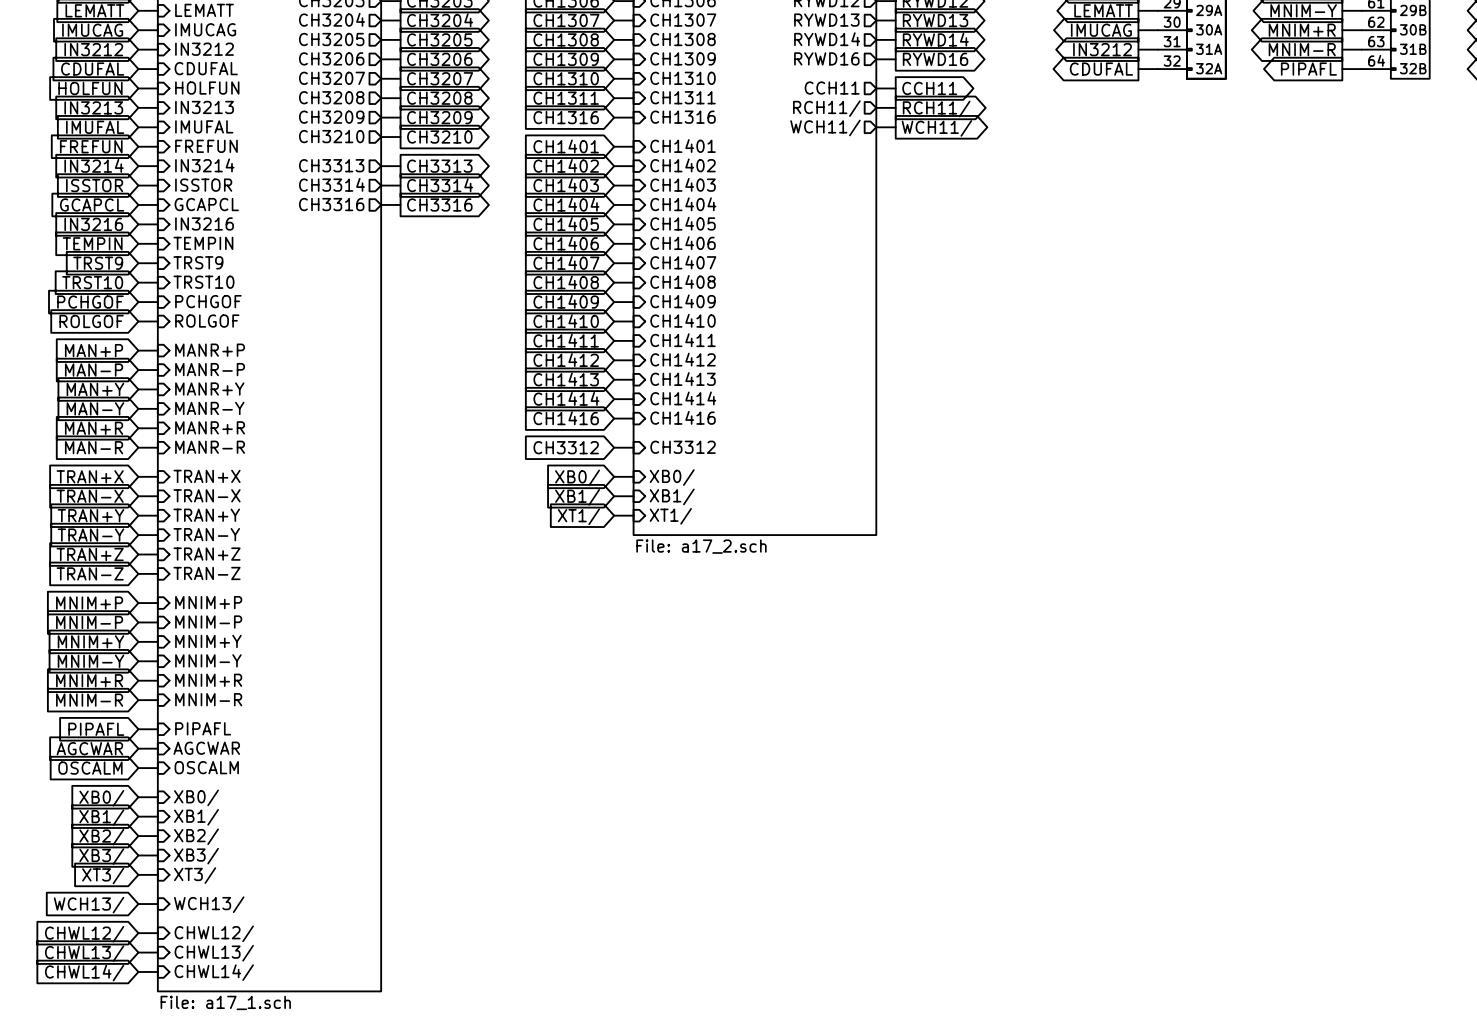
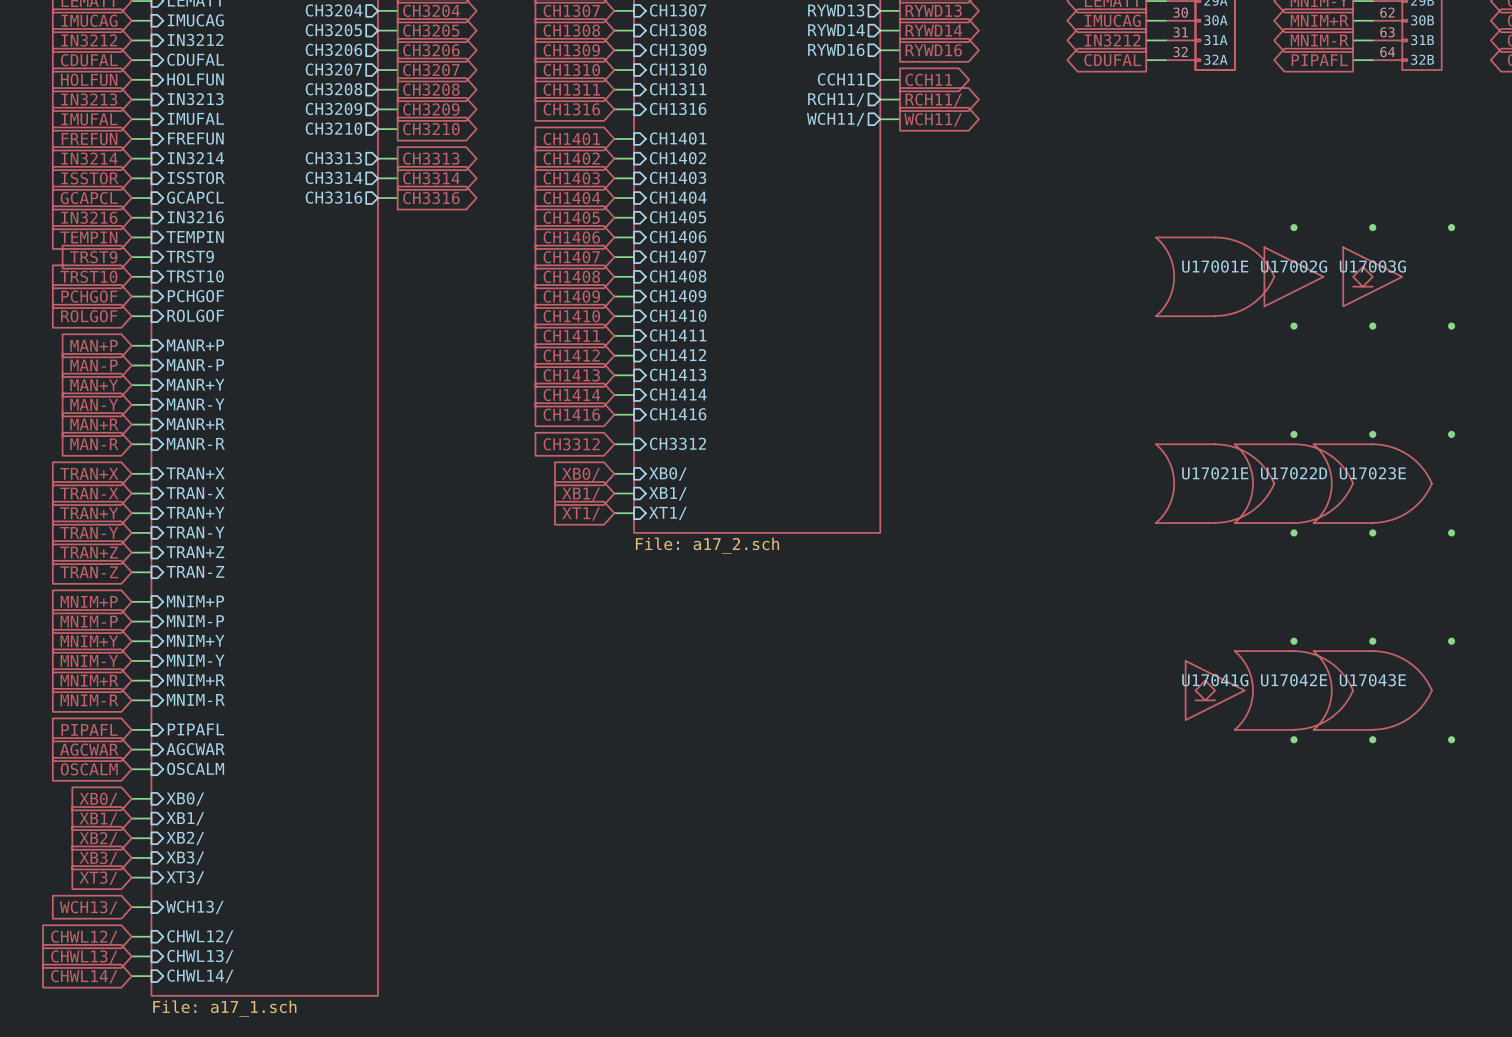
junction: none -> (1293, 227)
junction: none -> (1372, 227)
junction: none -> (1451, 227)
U17001E: none -> (1215, 276)
U17002G: none -> (1293, 276)
U17003G: none -> (1372, 276)
junction: none -> (1293, 326)
junction: none -> (1372, 326)
junction: none -> (1451, 326)
junction: none -> (1293, 434)
junction: none -> (1372, 434)
junction: none -> (1451, 434)
U17021E: none -> (1215, 483)
U17022D: none -> (1294, 483)
U17023E: none -> (1372, 483)
junction: none -> (1293, 532)
junction: none -> (1372, 532)
junction: none -> (1451, 532)
junction: none -> (1293, 641)
junction: none -> (1372, 641)
junction: none -> (1451, 641)
U17041G: none -> (1215, 690)
U17042E: none -> (1294, 690)
U17043E: none -> (1372, 690)
junction: none -> (1293, 739)
junction: none -> (1372, 739)
junction: none -> (1451, 739)

